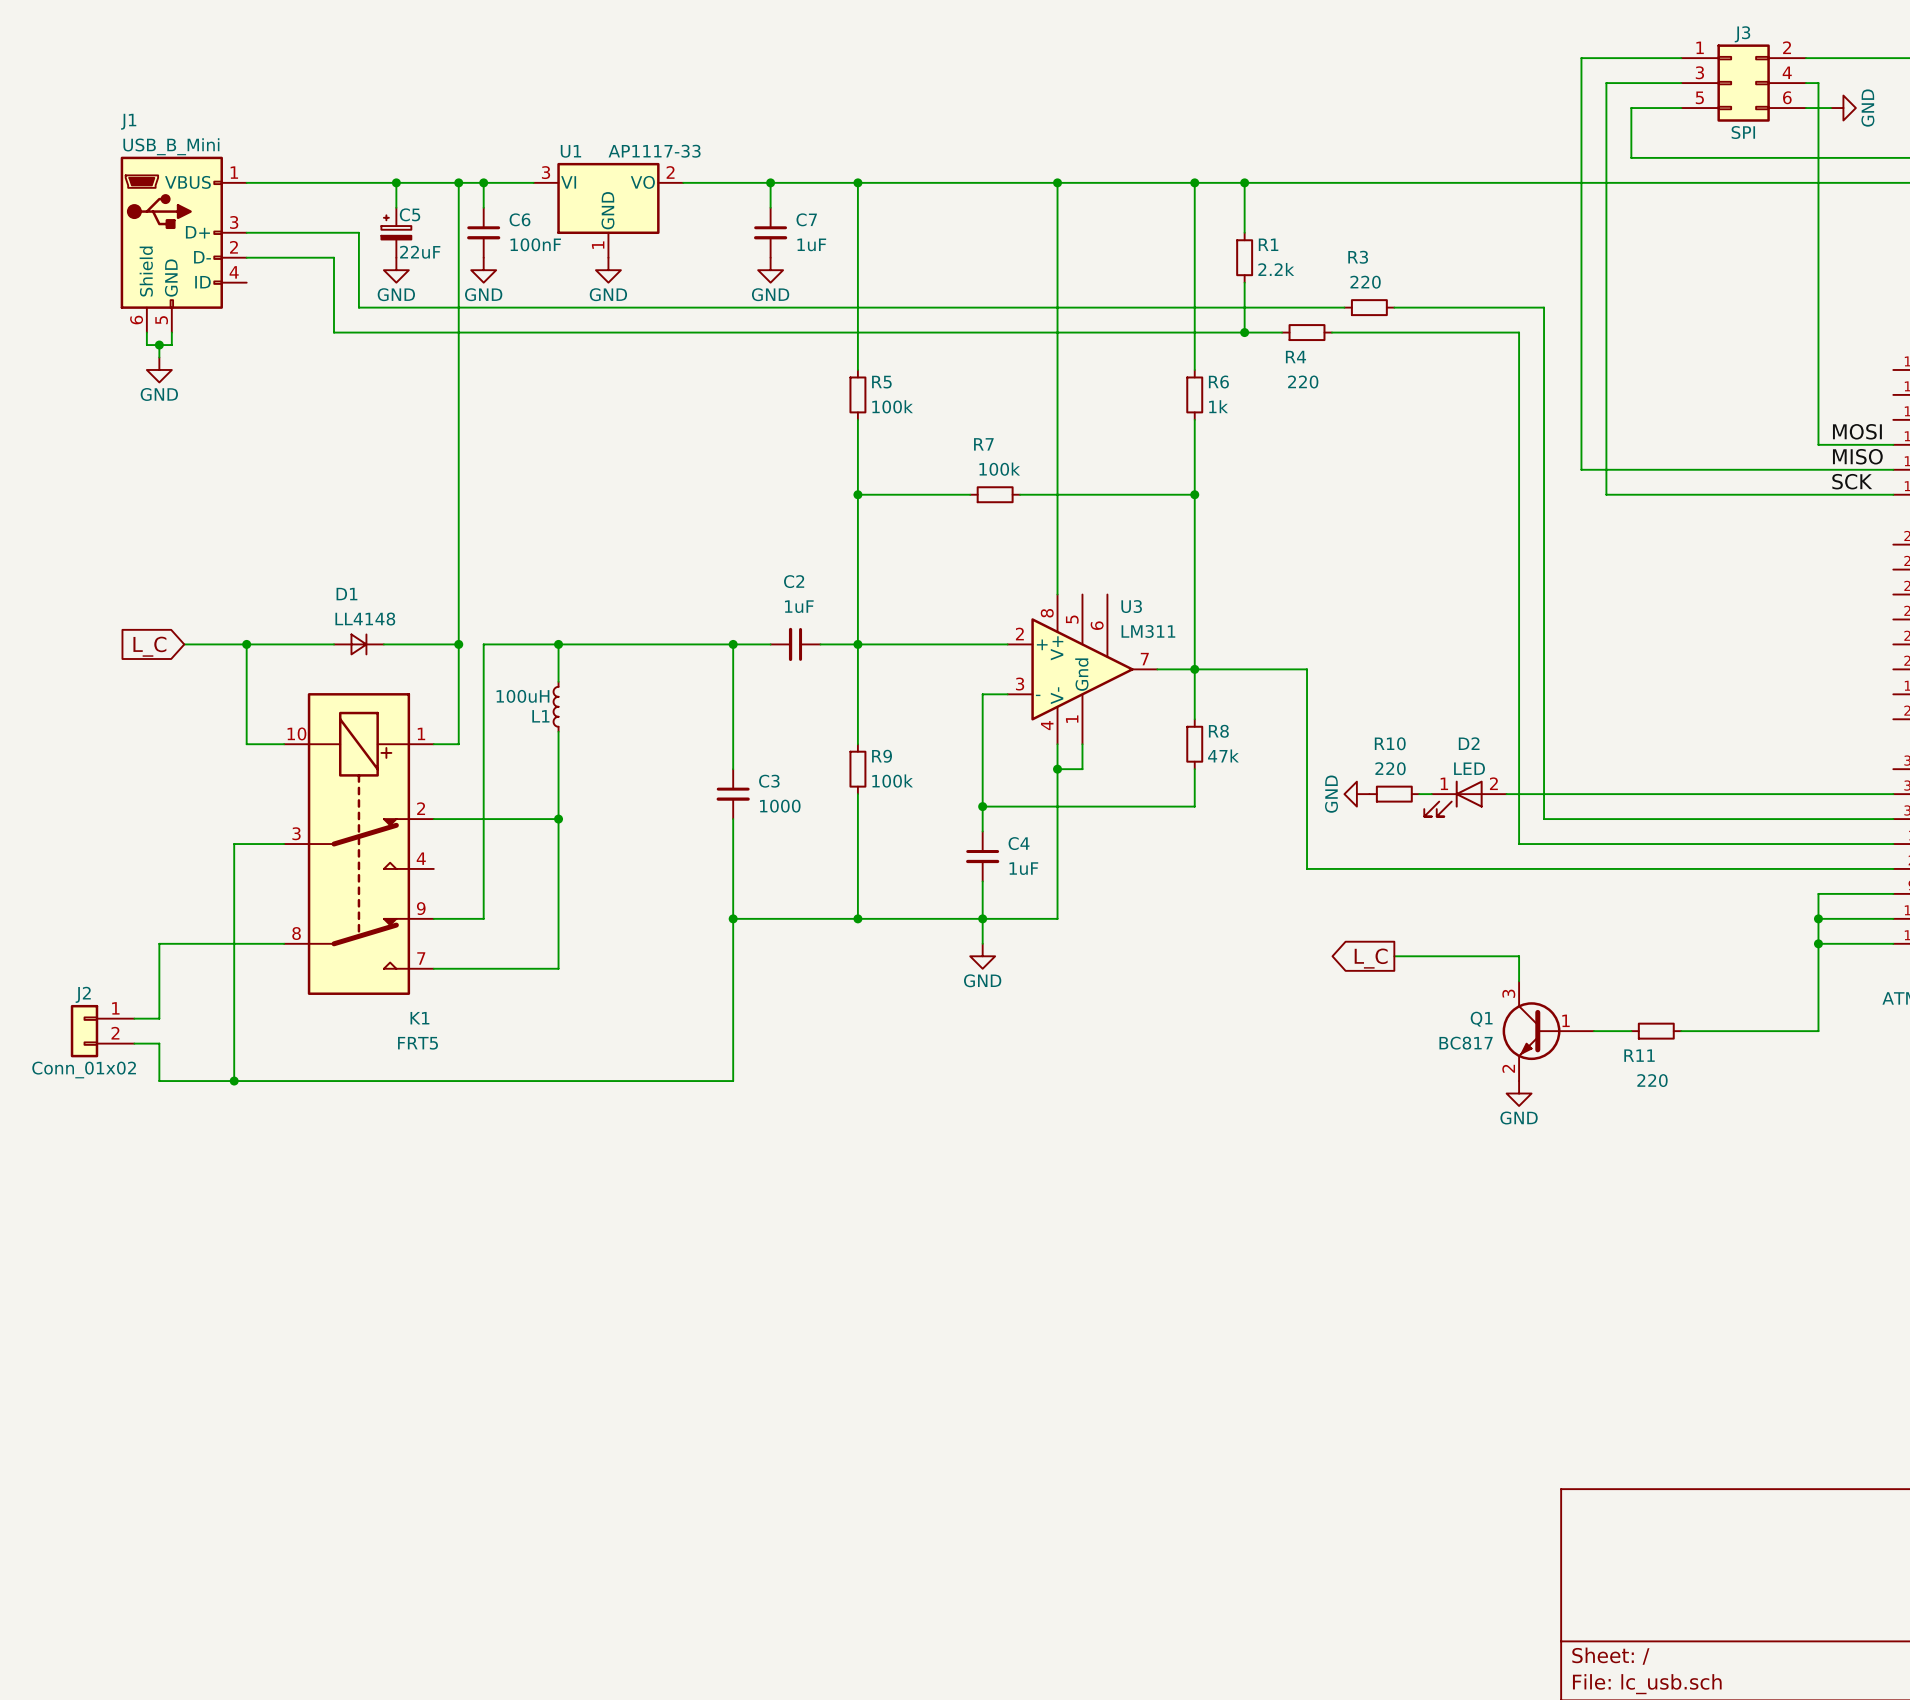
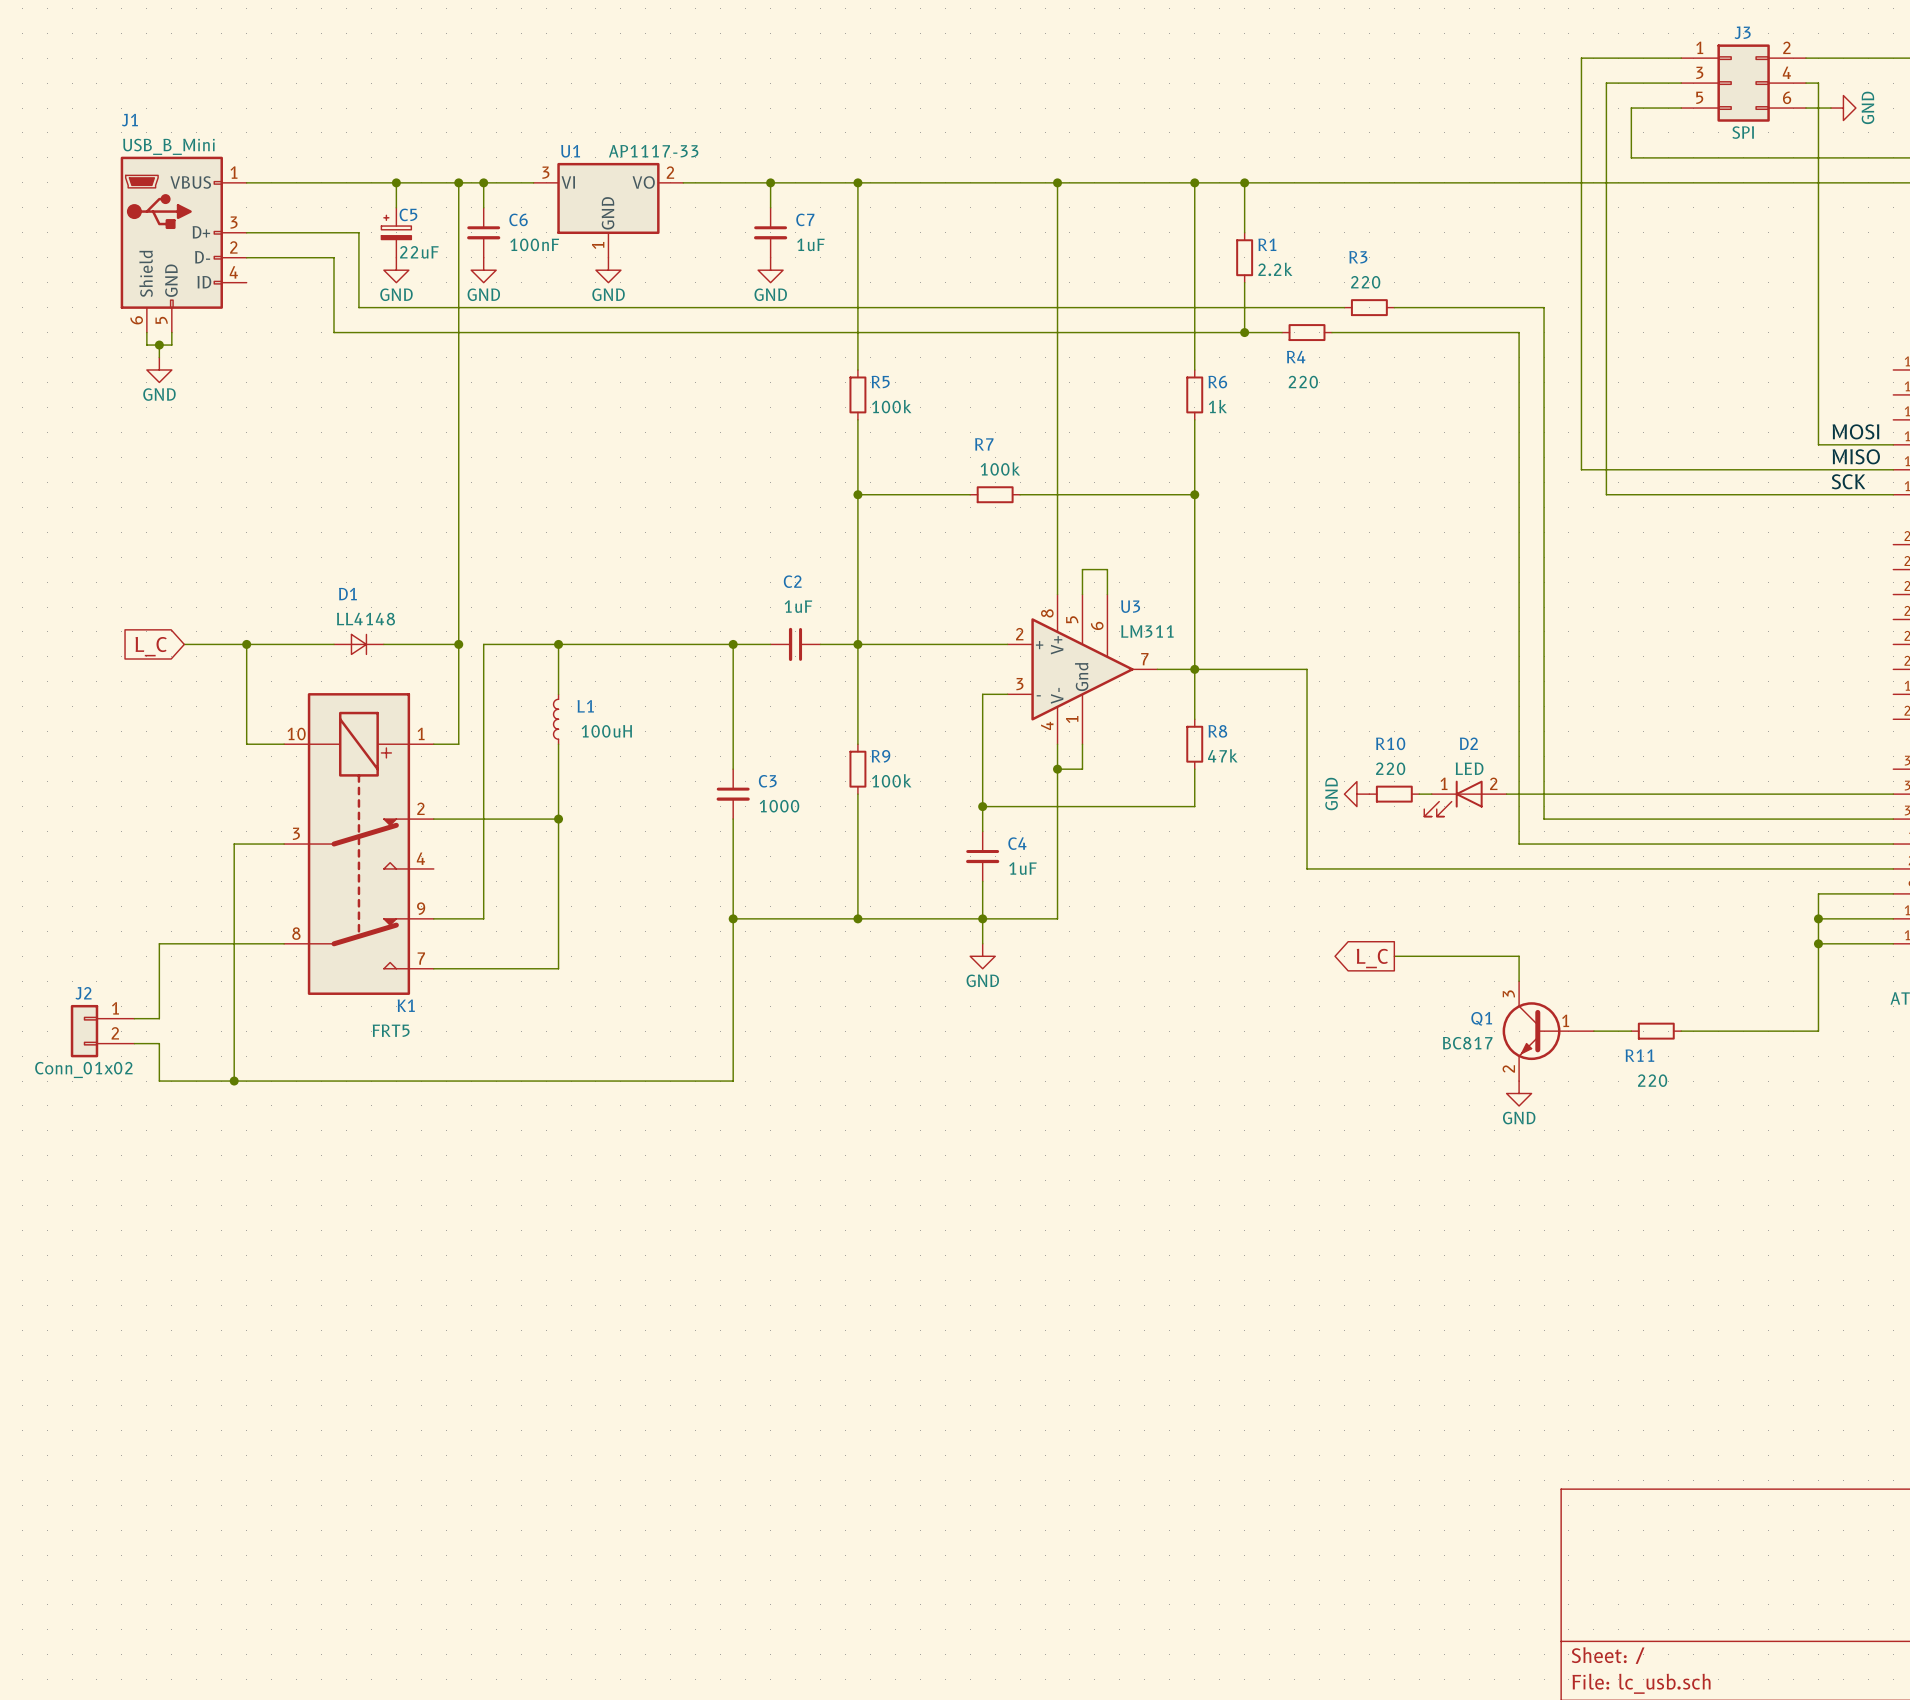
wire: none -> (1082, 594) (1082, 569) (1107, 569) (1107, 594)
L1 value position: 100uH (522, 696) -> 100uH (606, 731)
L1 position: (556, 706) -> (556, 719)
L1 name position: L1 (540, 716) -> L1 (585, 706)
wire: (558, 731) (558, 744) -> (558, 681) (558, 694)
K1 name position: K1 (419, 1018) -> K1 (406, 1005)
K1 value position: FRT5 (418, 1043) -> FRT5 (391, 1030)

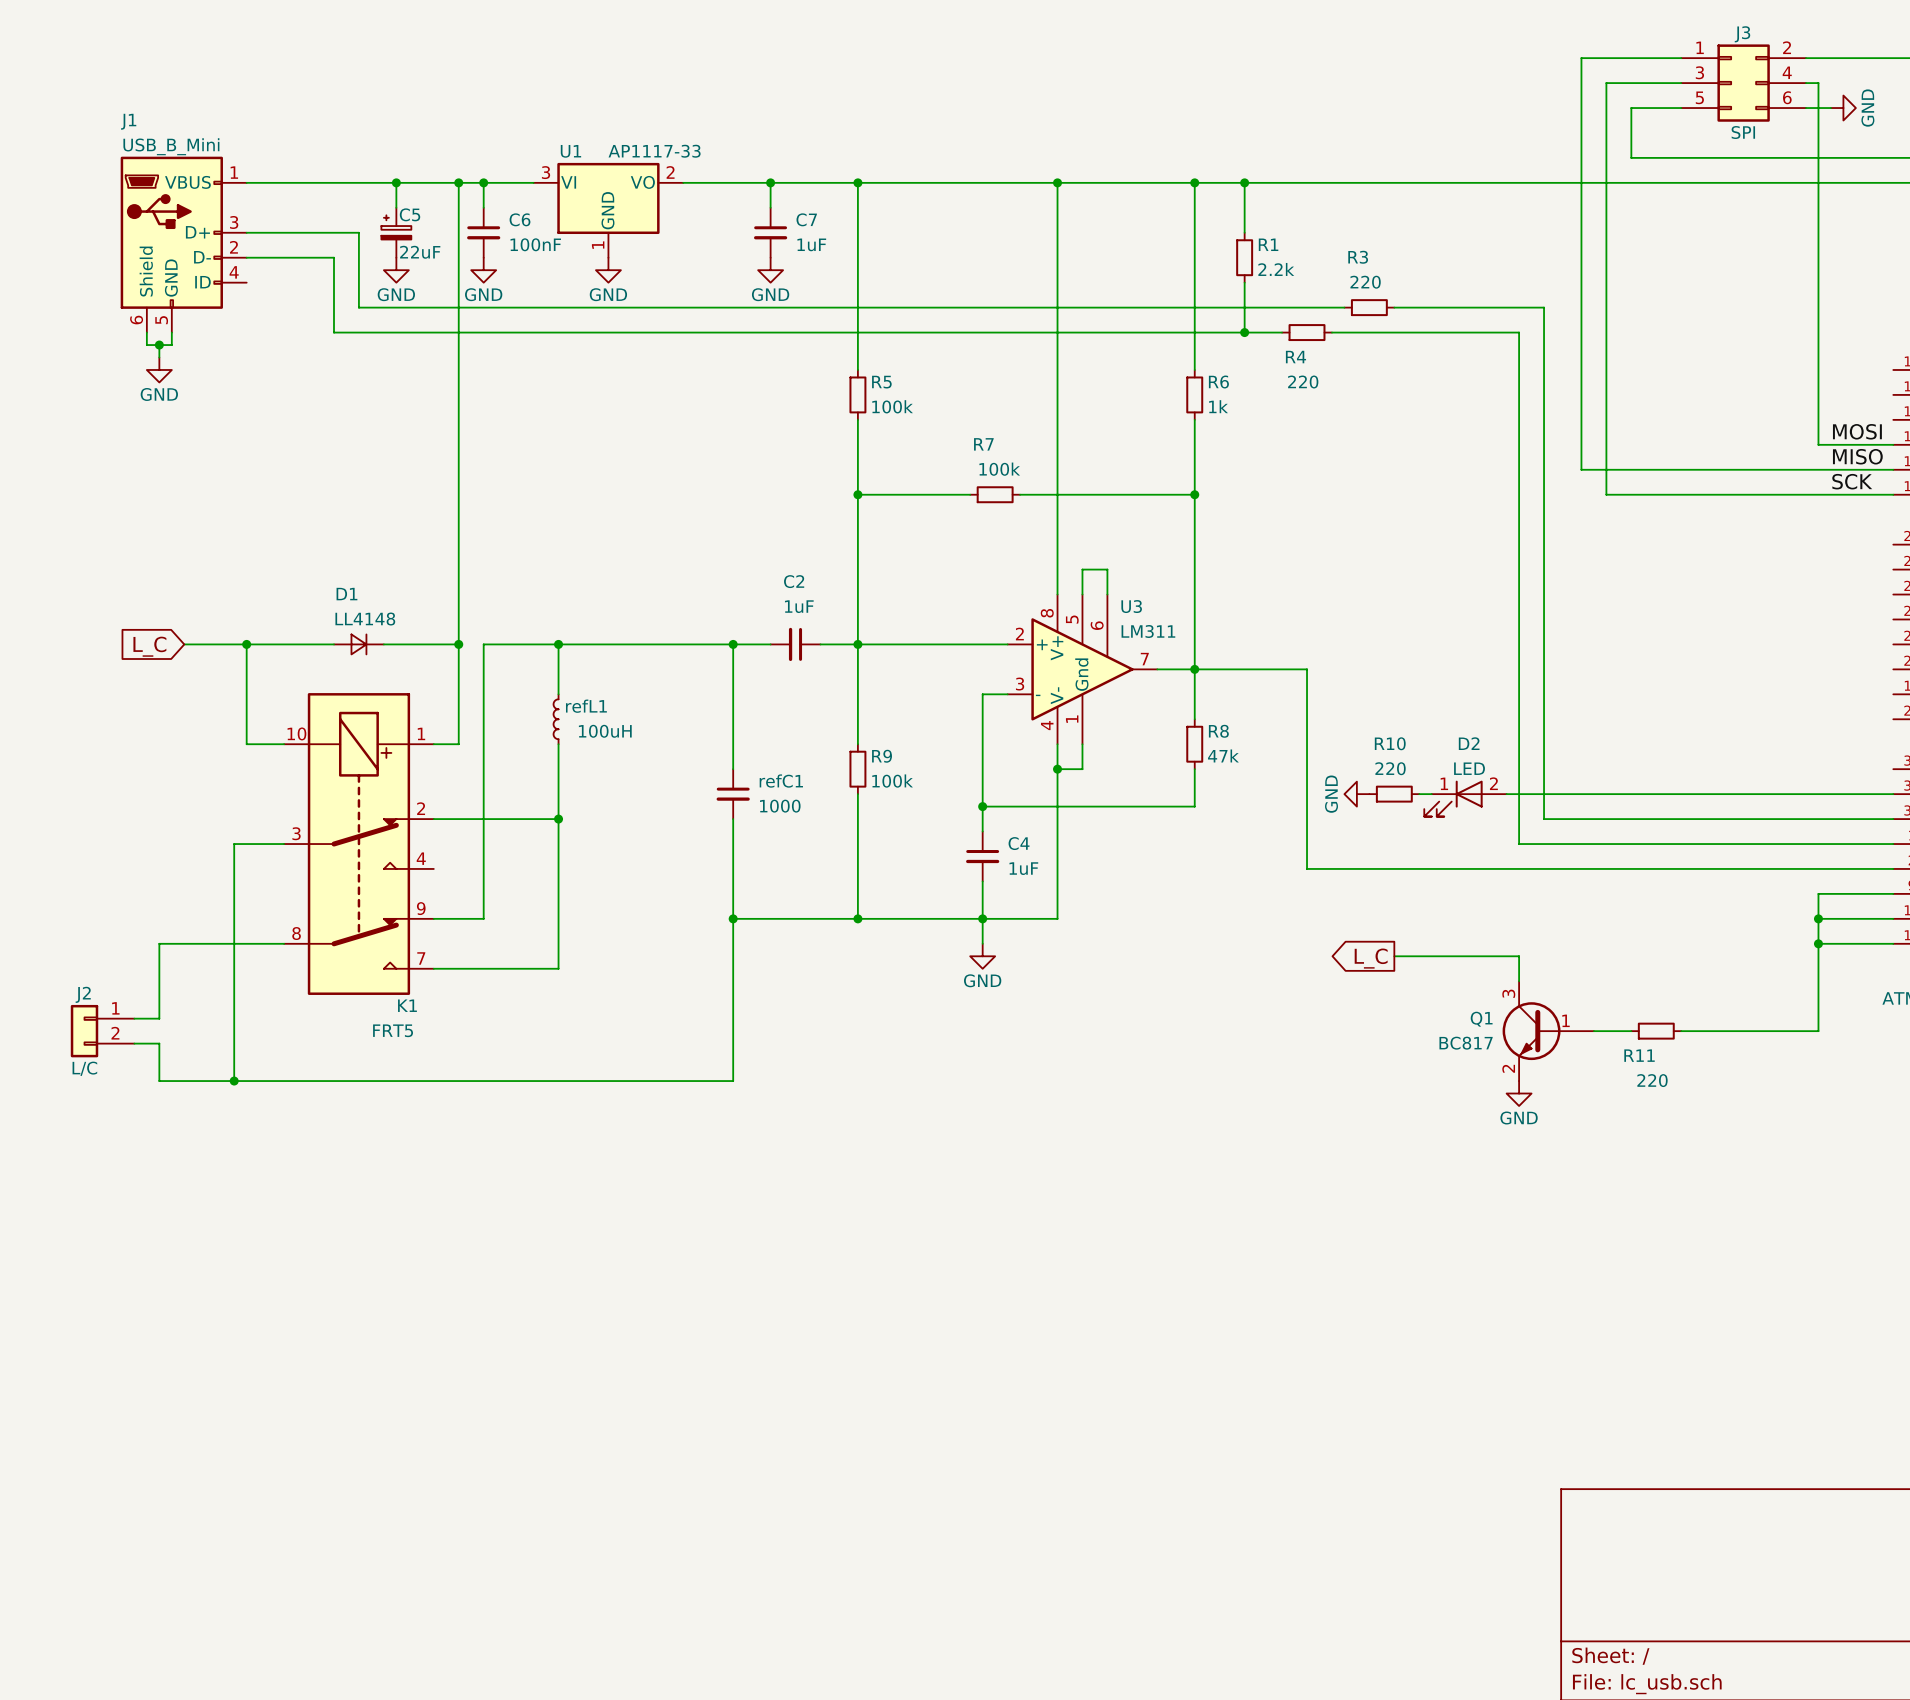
L1 name: L1 (585, 706) -> refL1 (586, 706)
C3 name: C3 (767, 781) -> refC1 (781, 781)
J2 value: Conn_01x02 (83, 1069) -> L/C (84, 1068)

